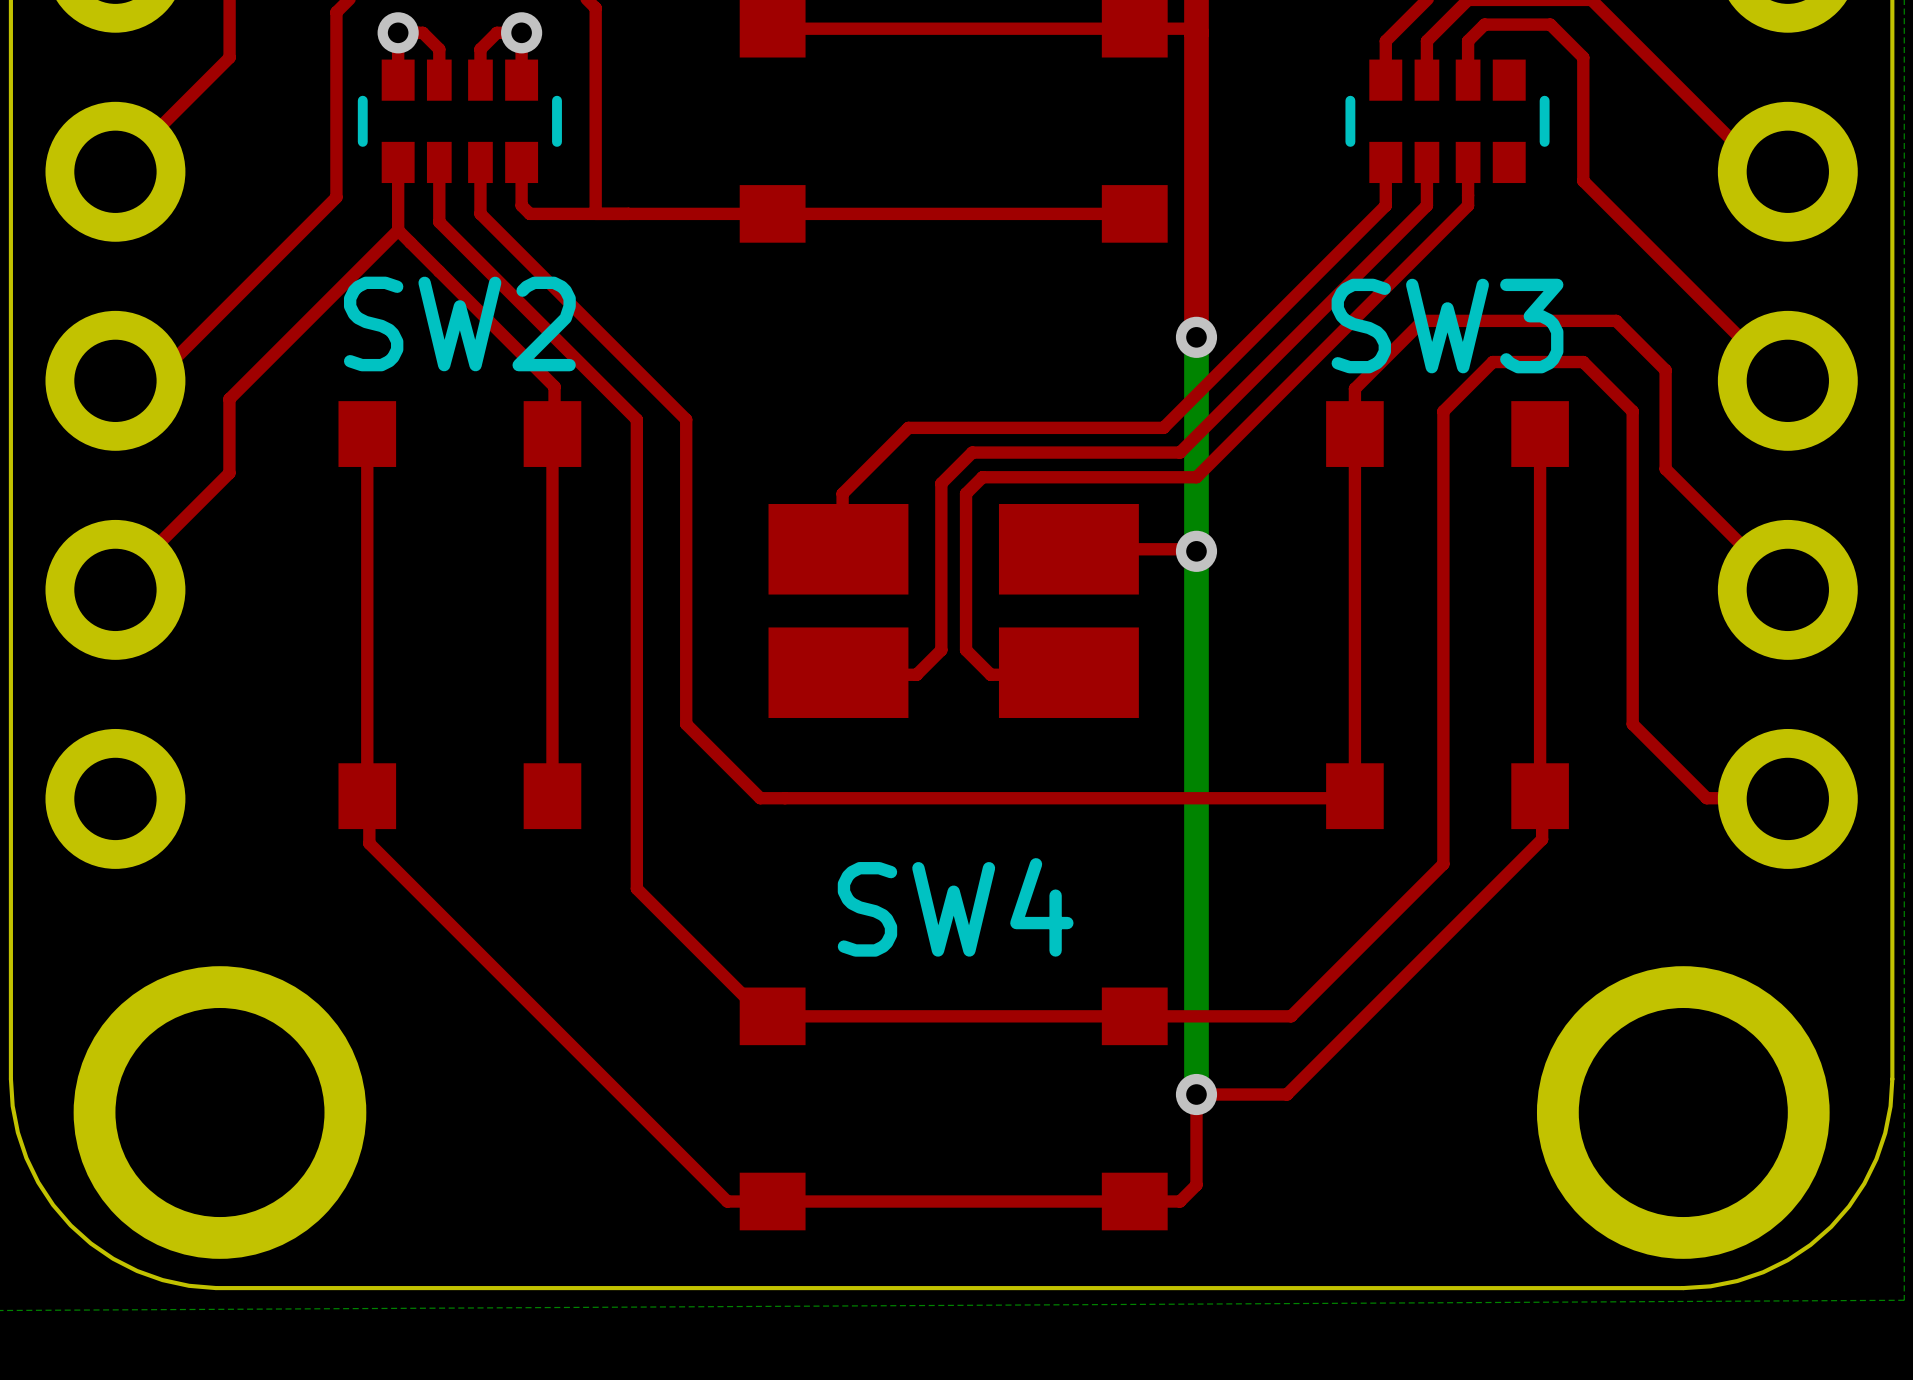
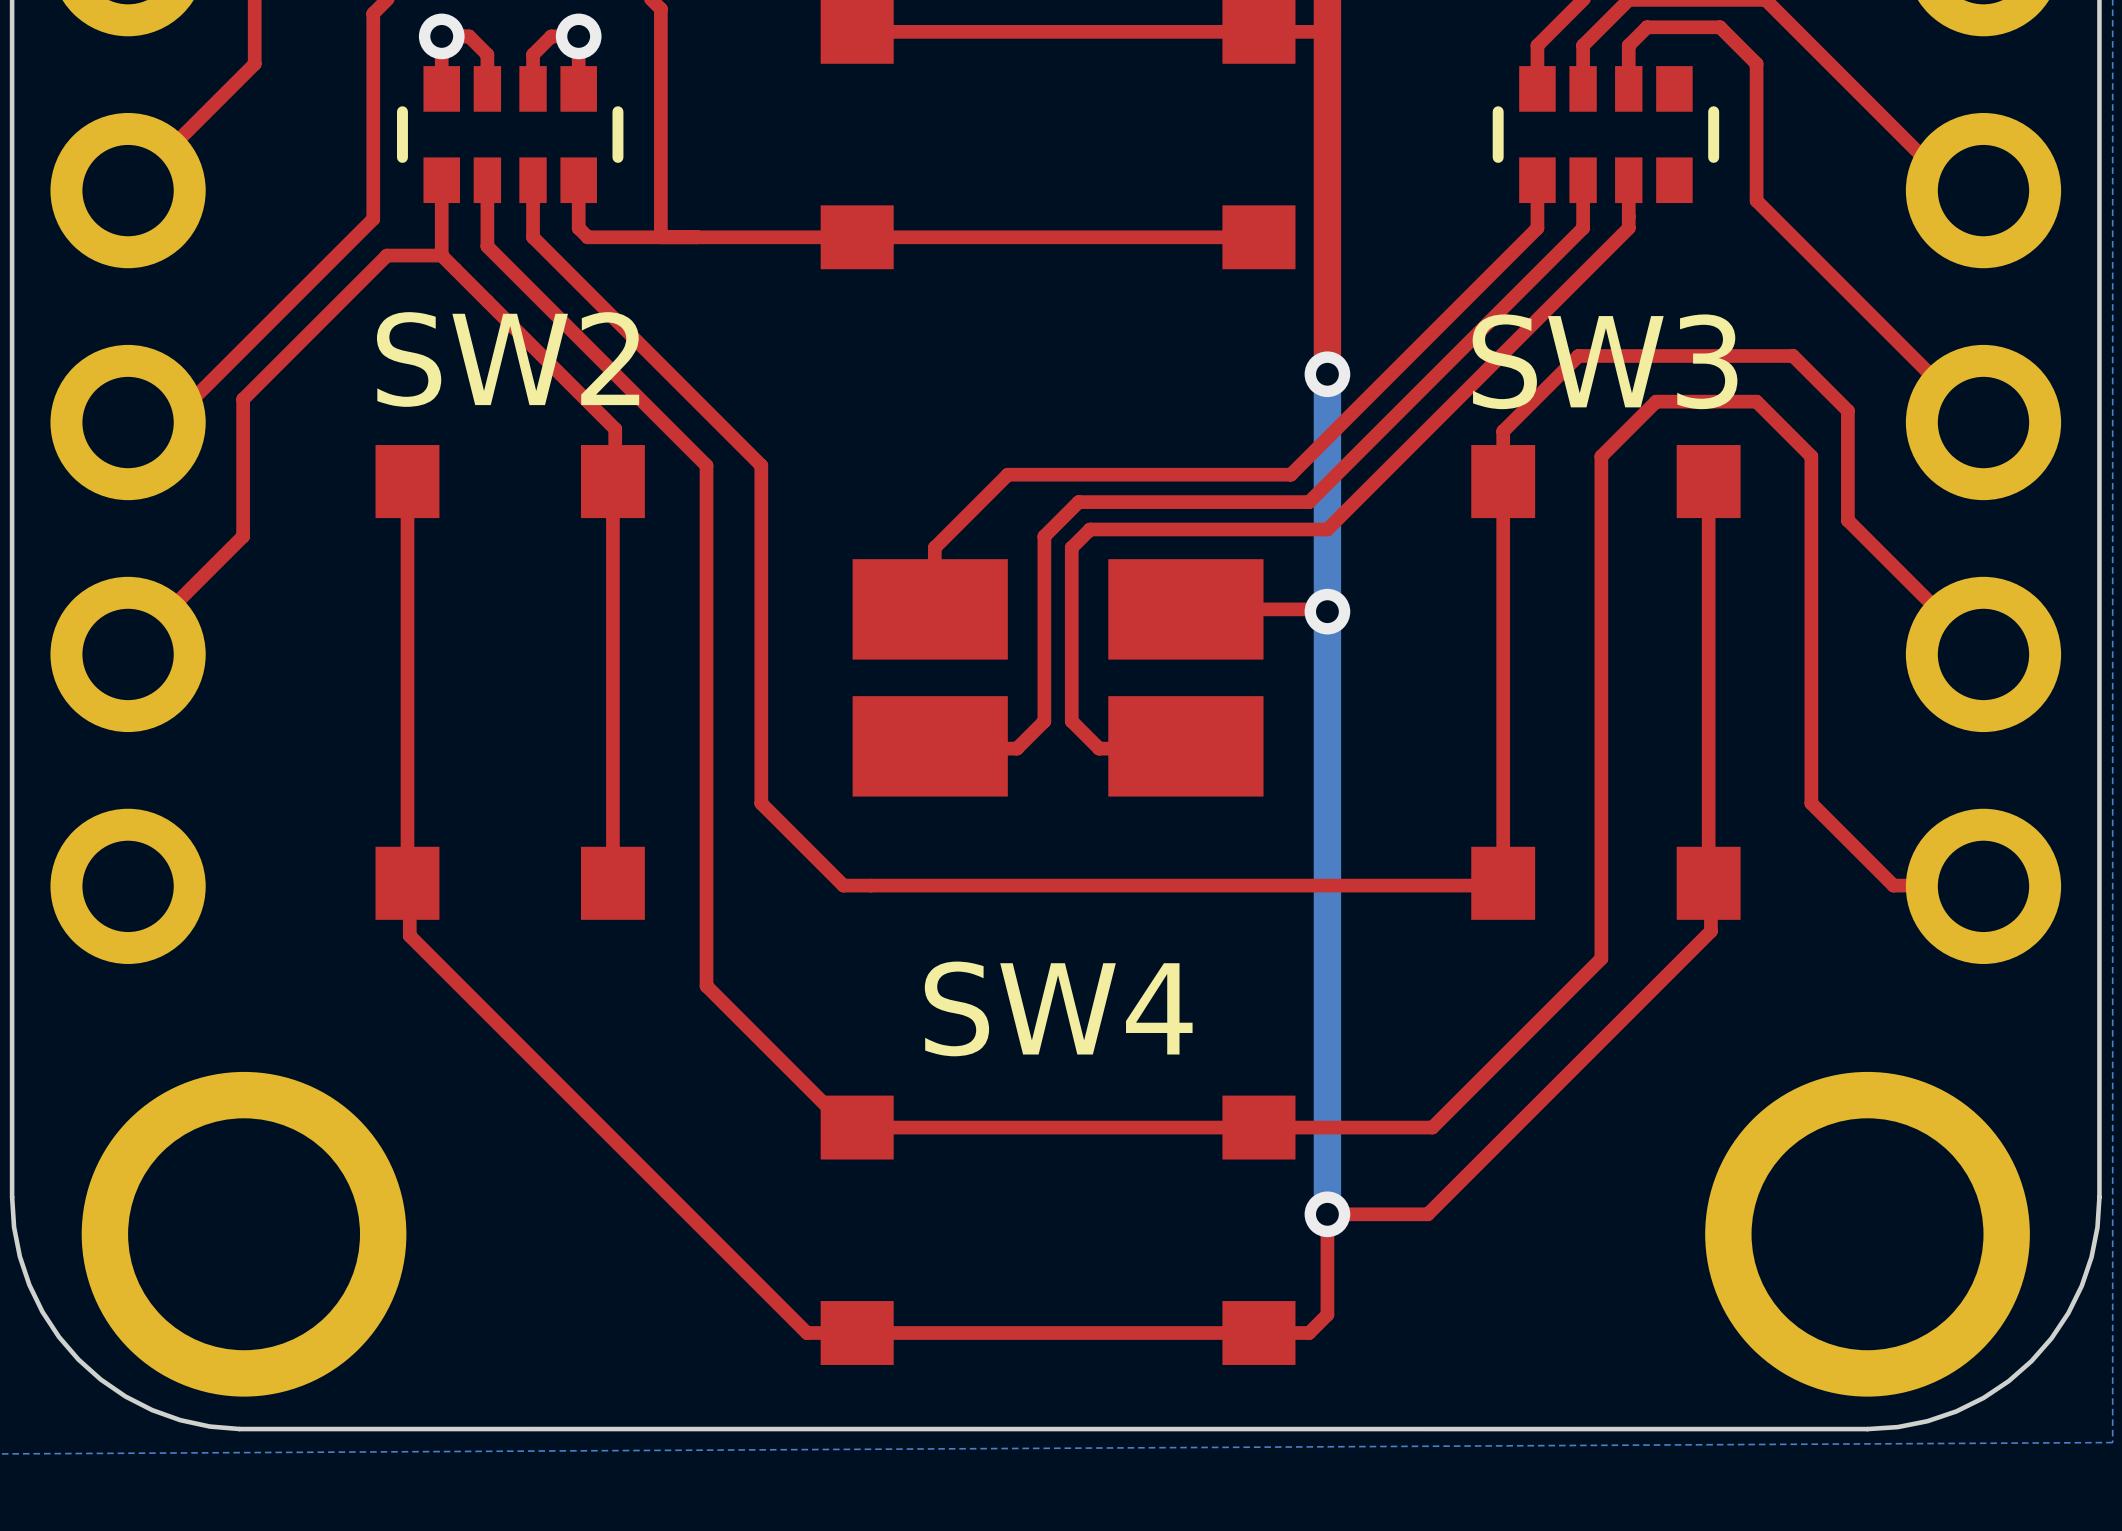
top track: (398, 230) (229, 399) (229, 473) (219, 483) -> (441, 255) (386, 255) (243, 399) (243, 536)

